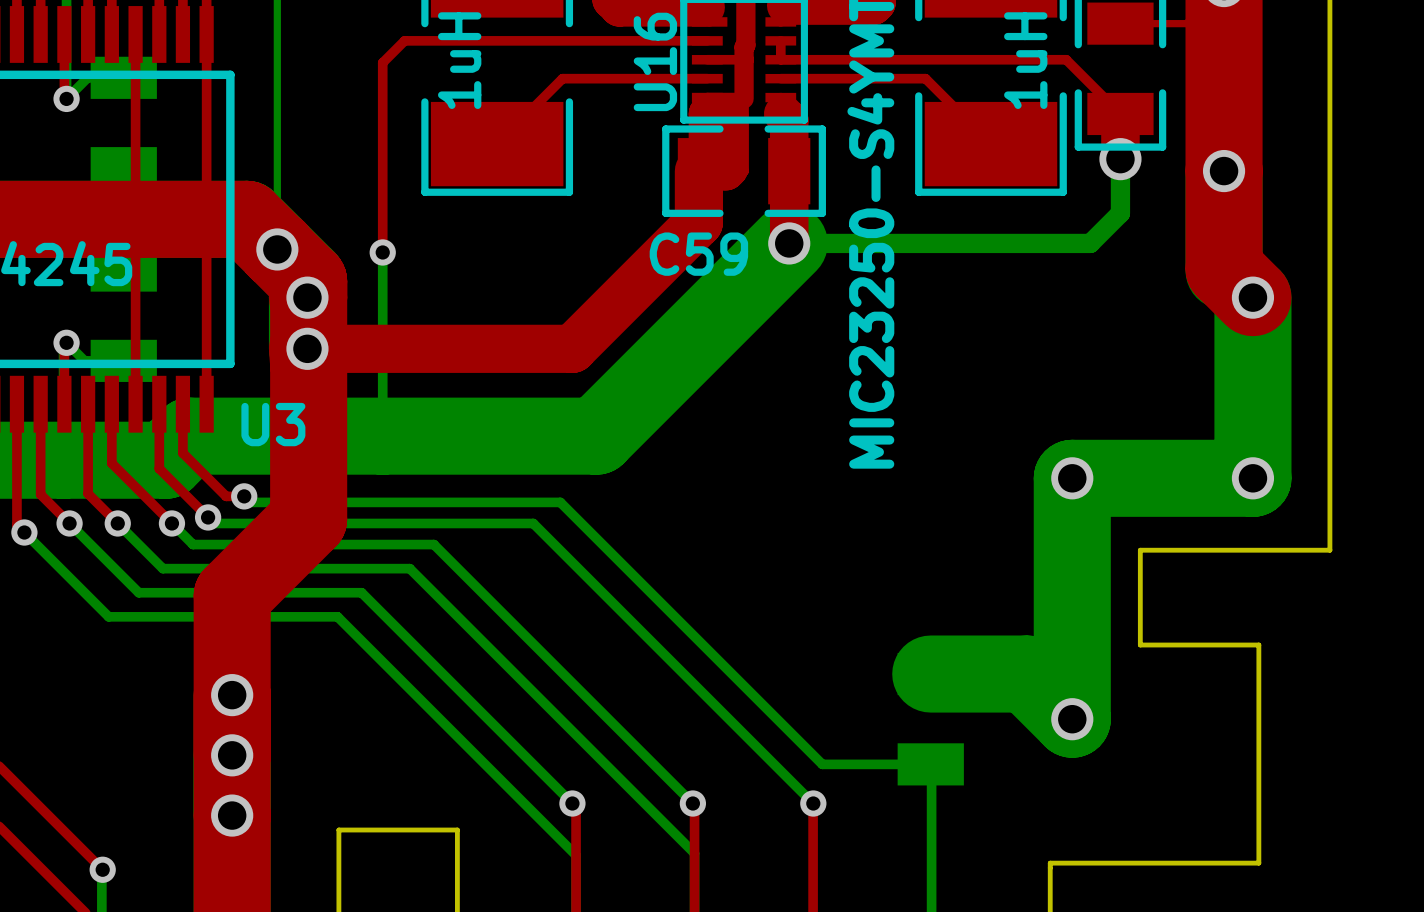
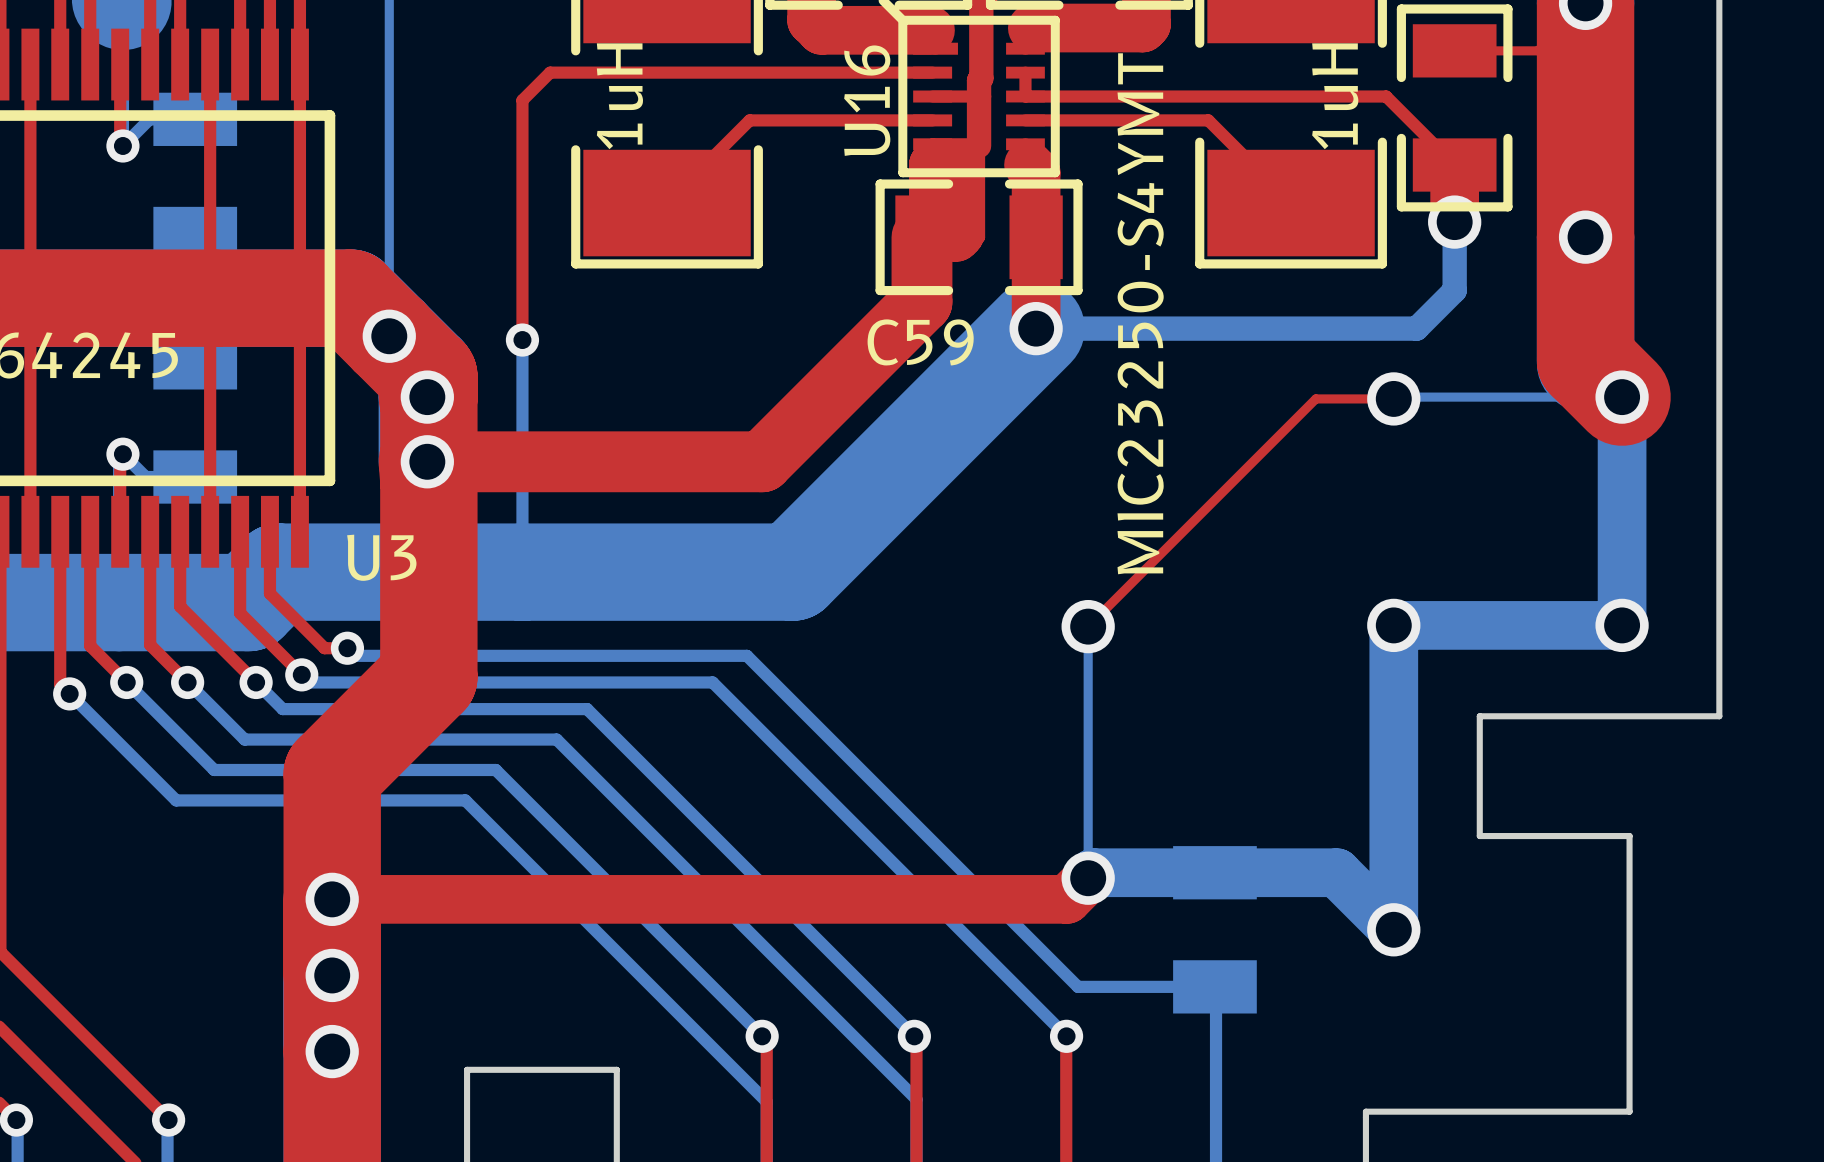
bottom track: none -> (1622, 397) (1395, 397) (1393, 398)
bottom track width: thick (1252, 297) (1252, 478) (1072, 478) (1072, 719) (1027, 674) (930, 674) -> thin (1622, 397) (1622, 625) (1393, 625) (1393, 929) (1336, 872) (1214, 872)
top track: none -> (1393, 398) (1315, 398) (1088, 626)
via: none -> (1393, 398)
bottom track: none -> (1088, 626) (1088, 878) (1093, 872) (1214, 872)
via: none -> (1088, 626)
top track: none -> (1088, 878) (1067, 899) (332, 899)
via: none -> (1088, 878)

